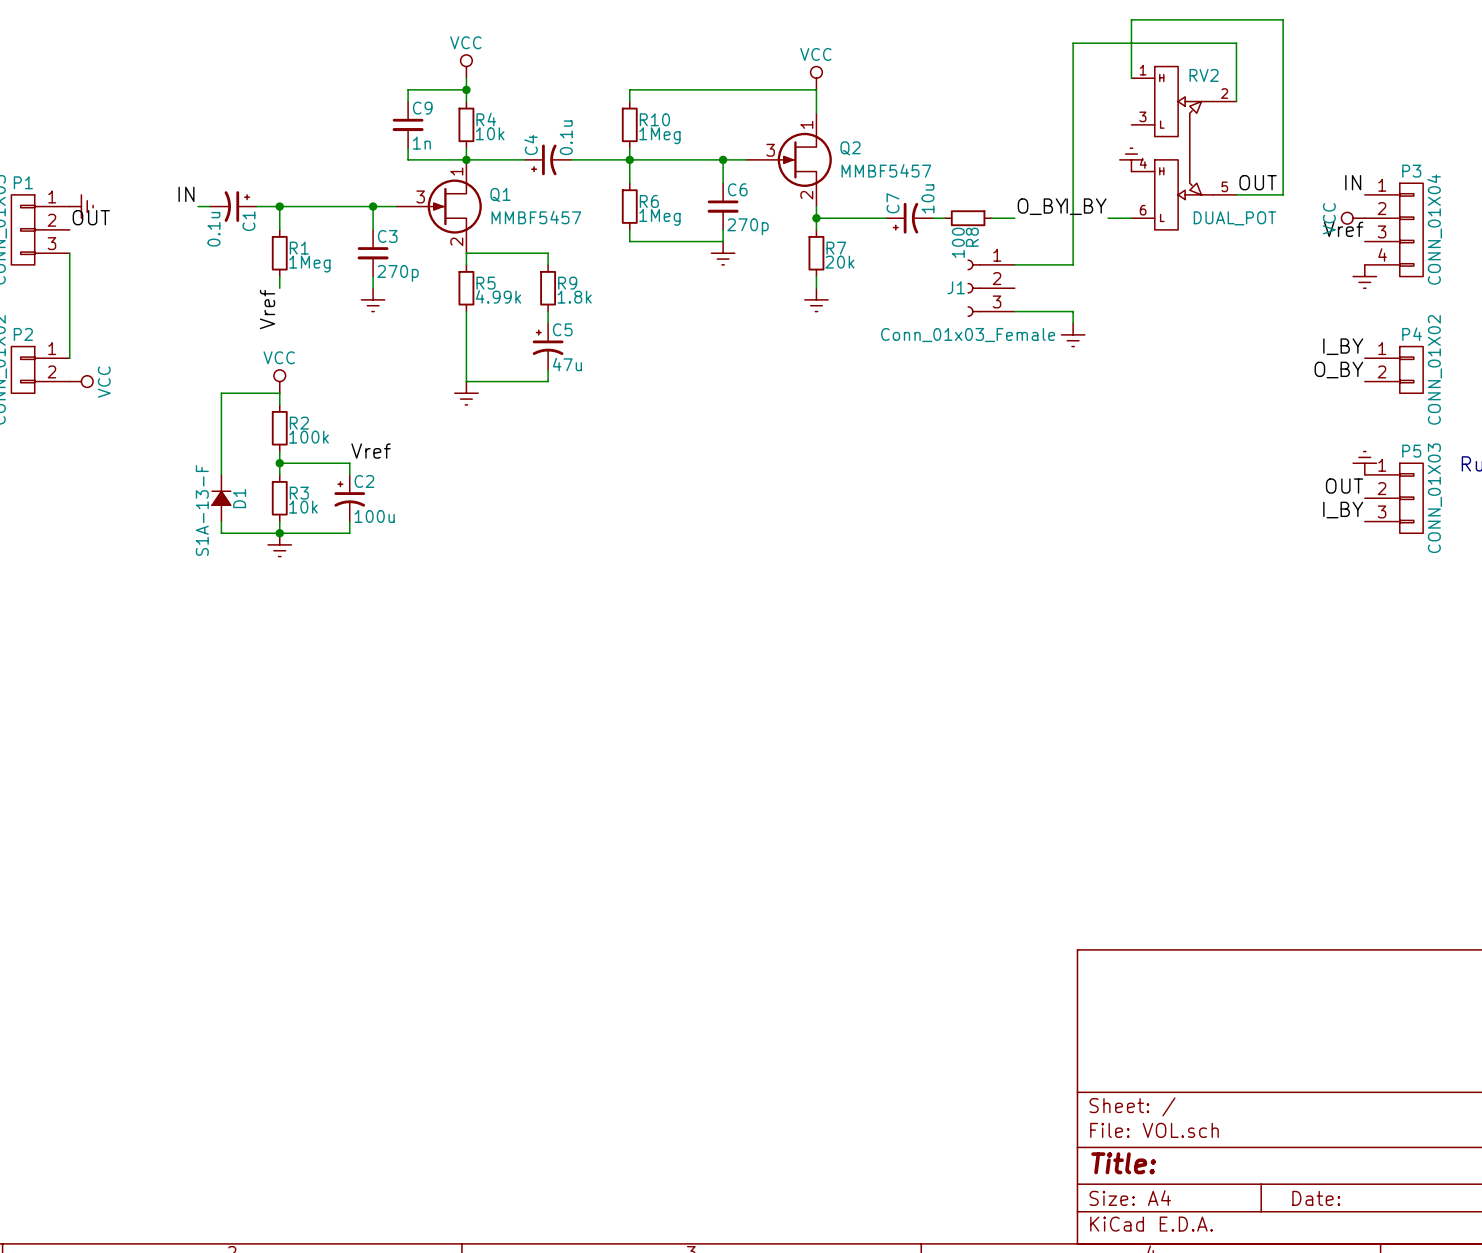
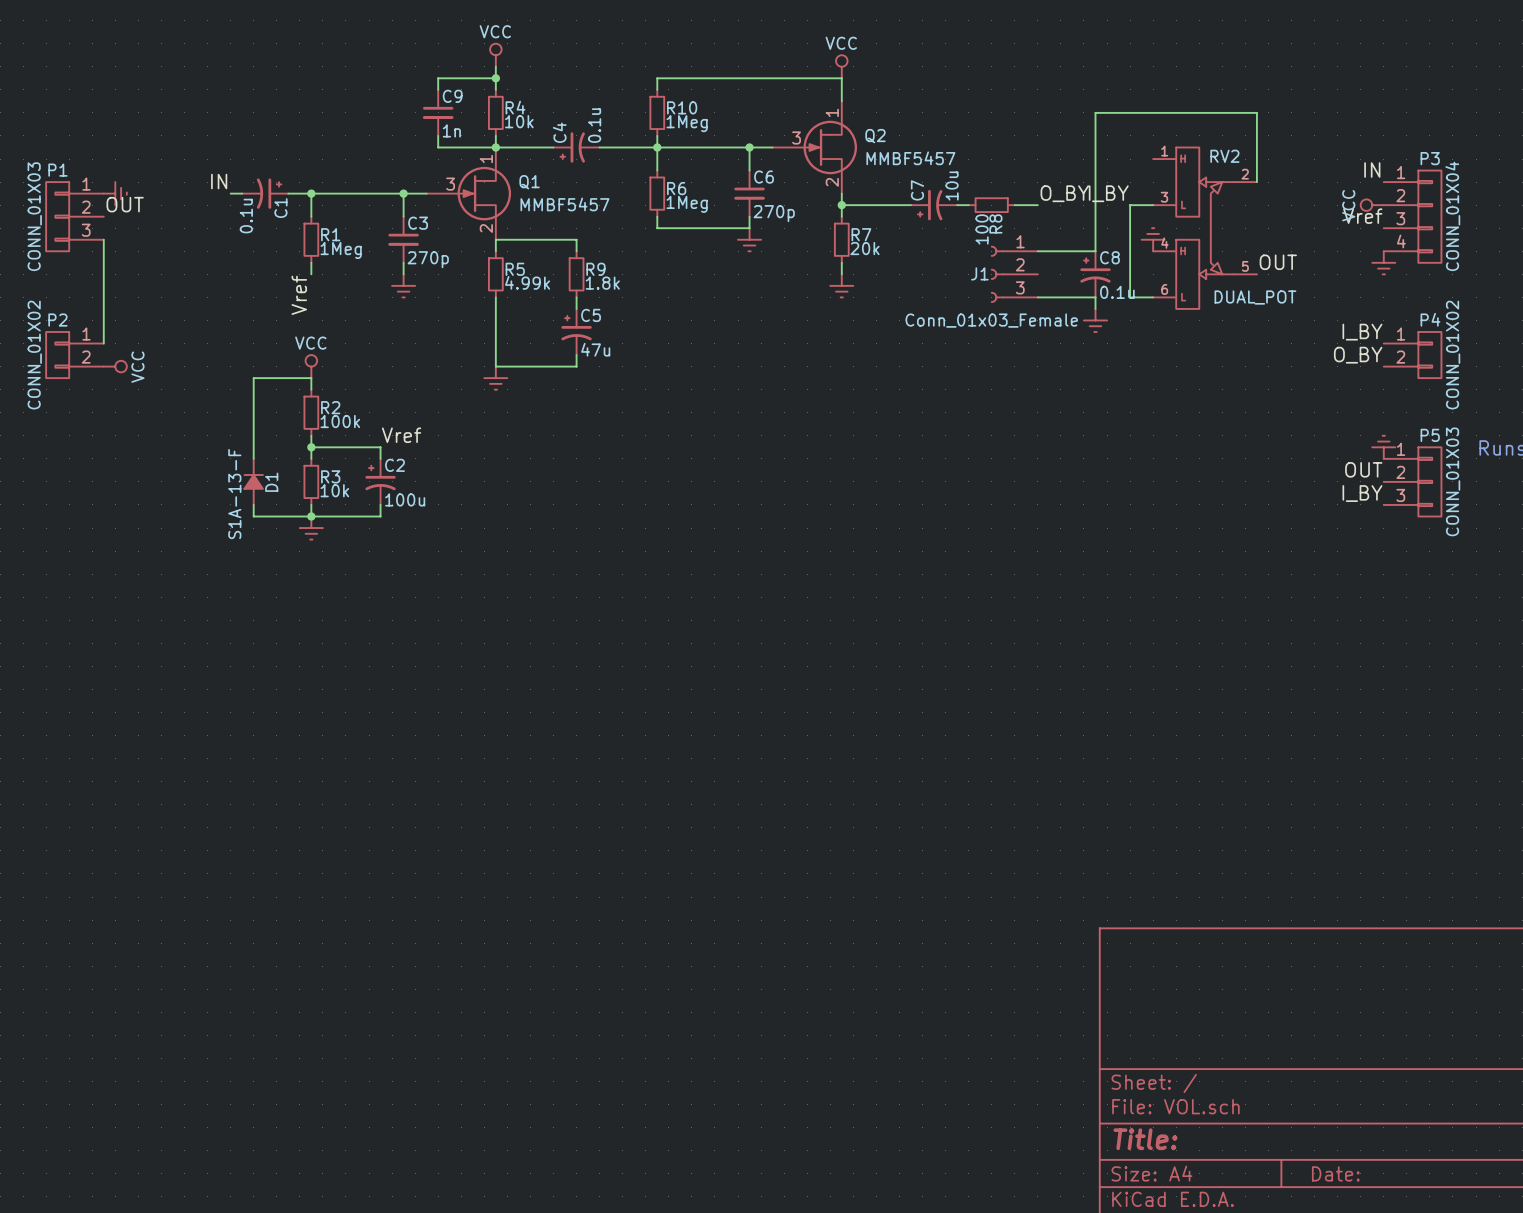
wire: (1131, 78) (1131, 19) (1283, 19) (1283, 194) (1236, 194) -> (1095, 112) (1256, 112) (1256, 182)
wire: (1236, 101) (1236, 43) (1073, 43) (1073, 124) -> none
RV2 position: (1183, 148) -> (1205, 228)
power symbol position: (1131, 159) -> (1153, 239)
label position: OUT (1258, 182) -> OUT (1278, 262)
wire: none -> (1130, 205) (1130, 297) (1153, 297)
C8: none -> 0.1u (1095, 274)

